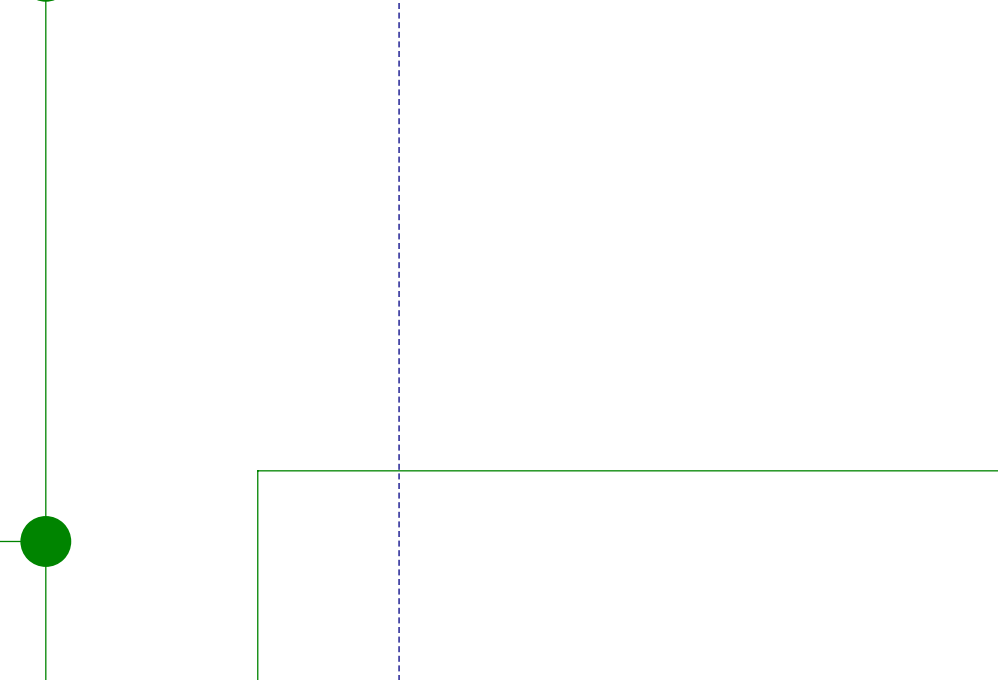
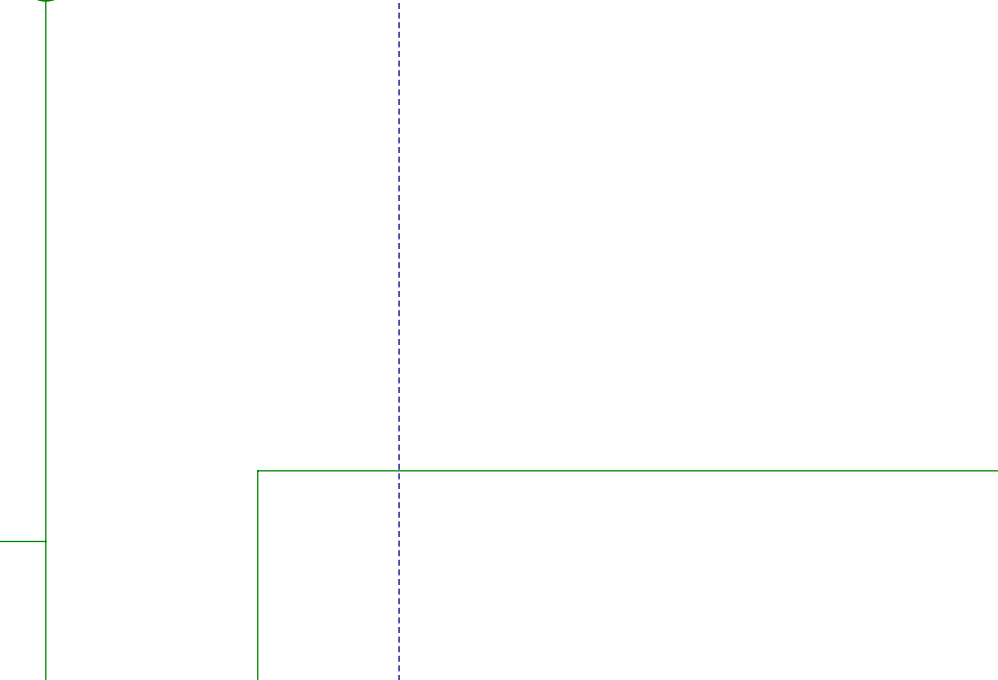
junction: (45, 541) -> none

